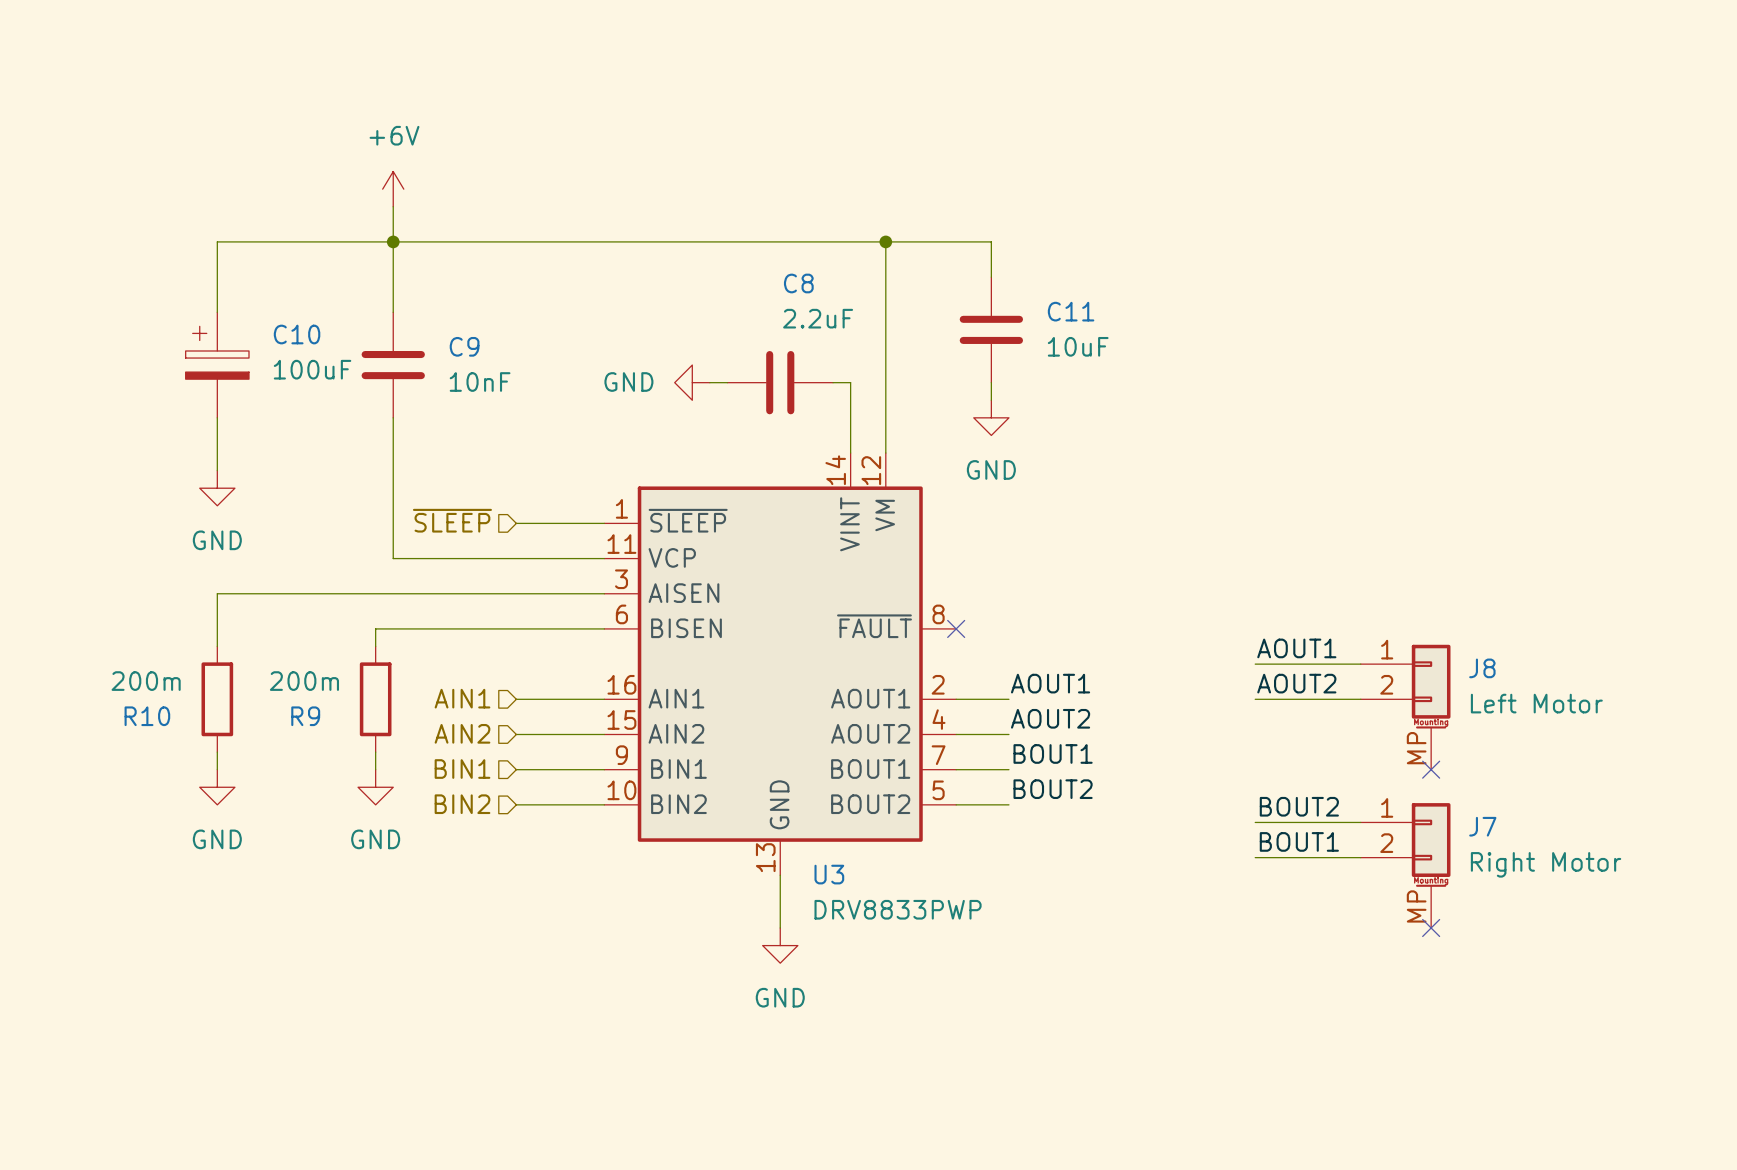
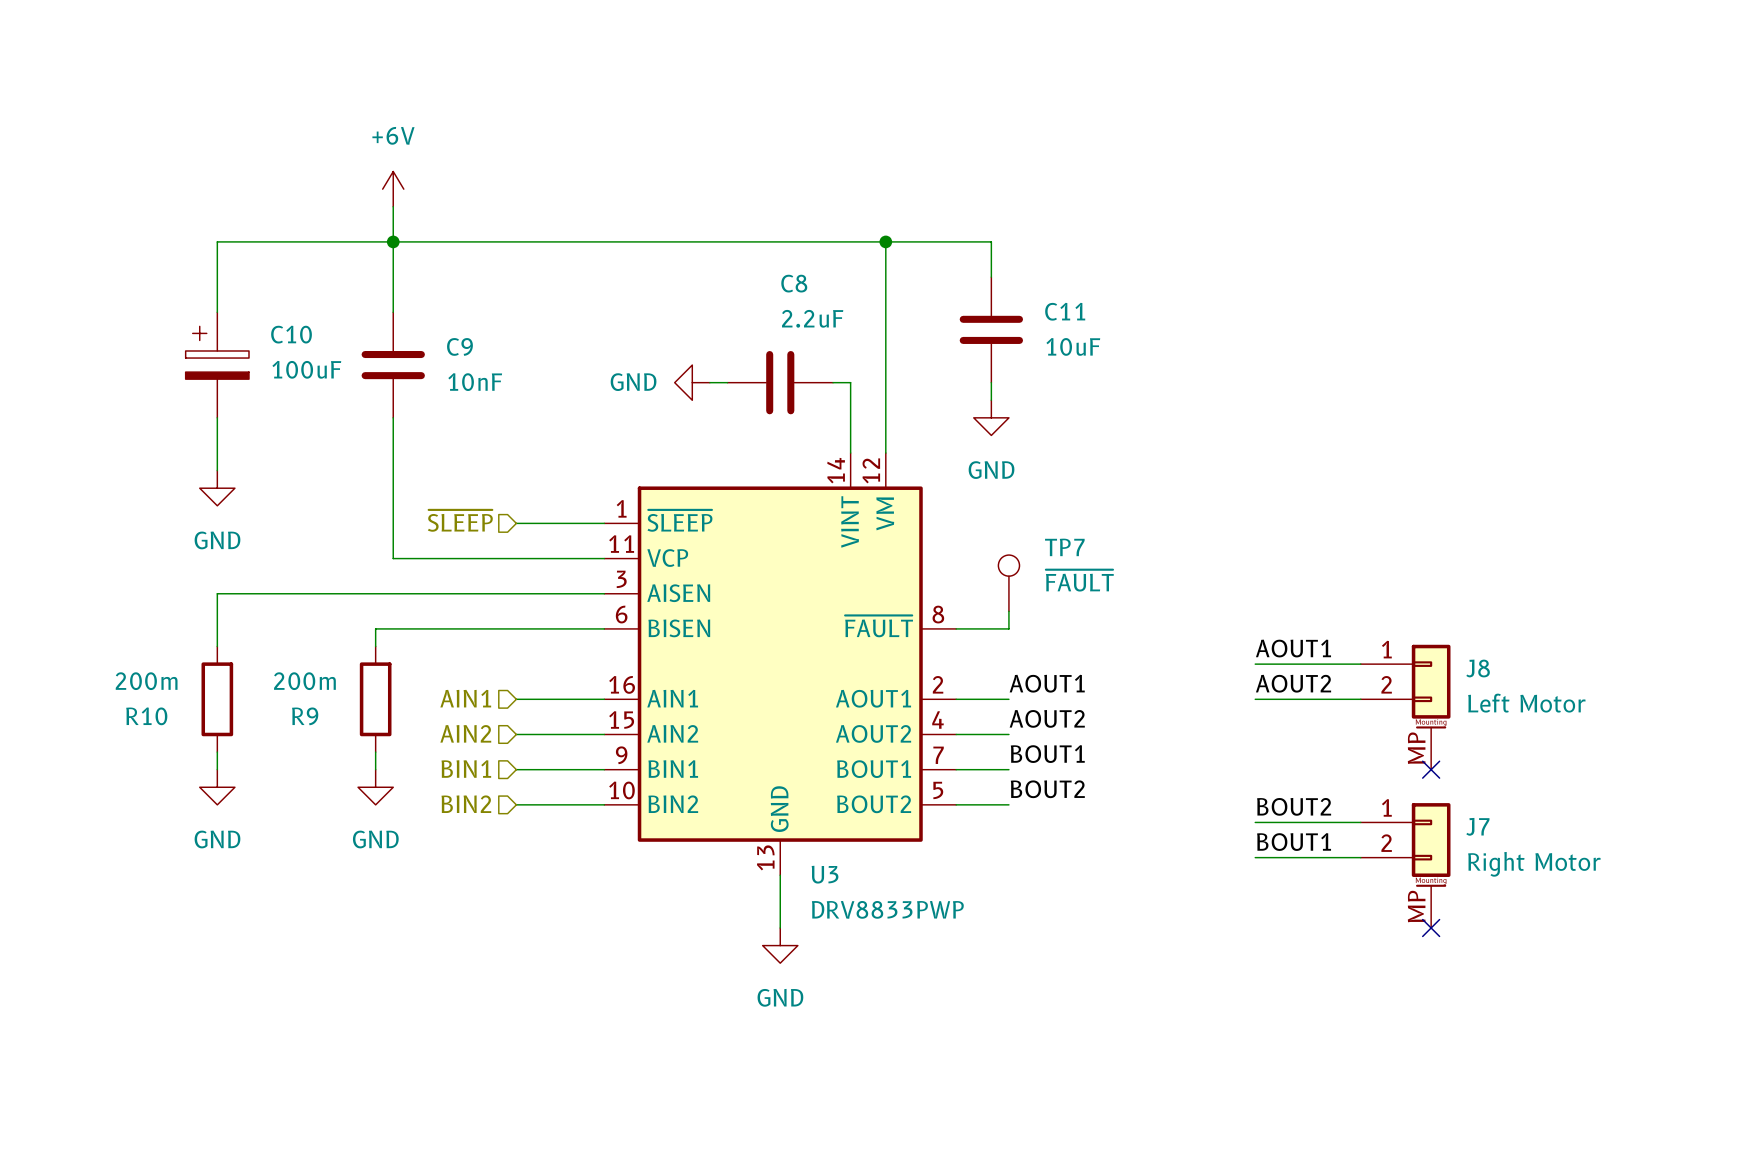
TP7: none -> ~{FAULT} (1008, 583)
wire: none -> (1008, 611) (1008, 628) (956, 628)
no-connect mark: (956, 628) -> none

